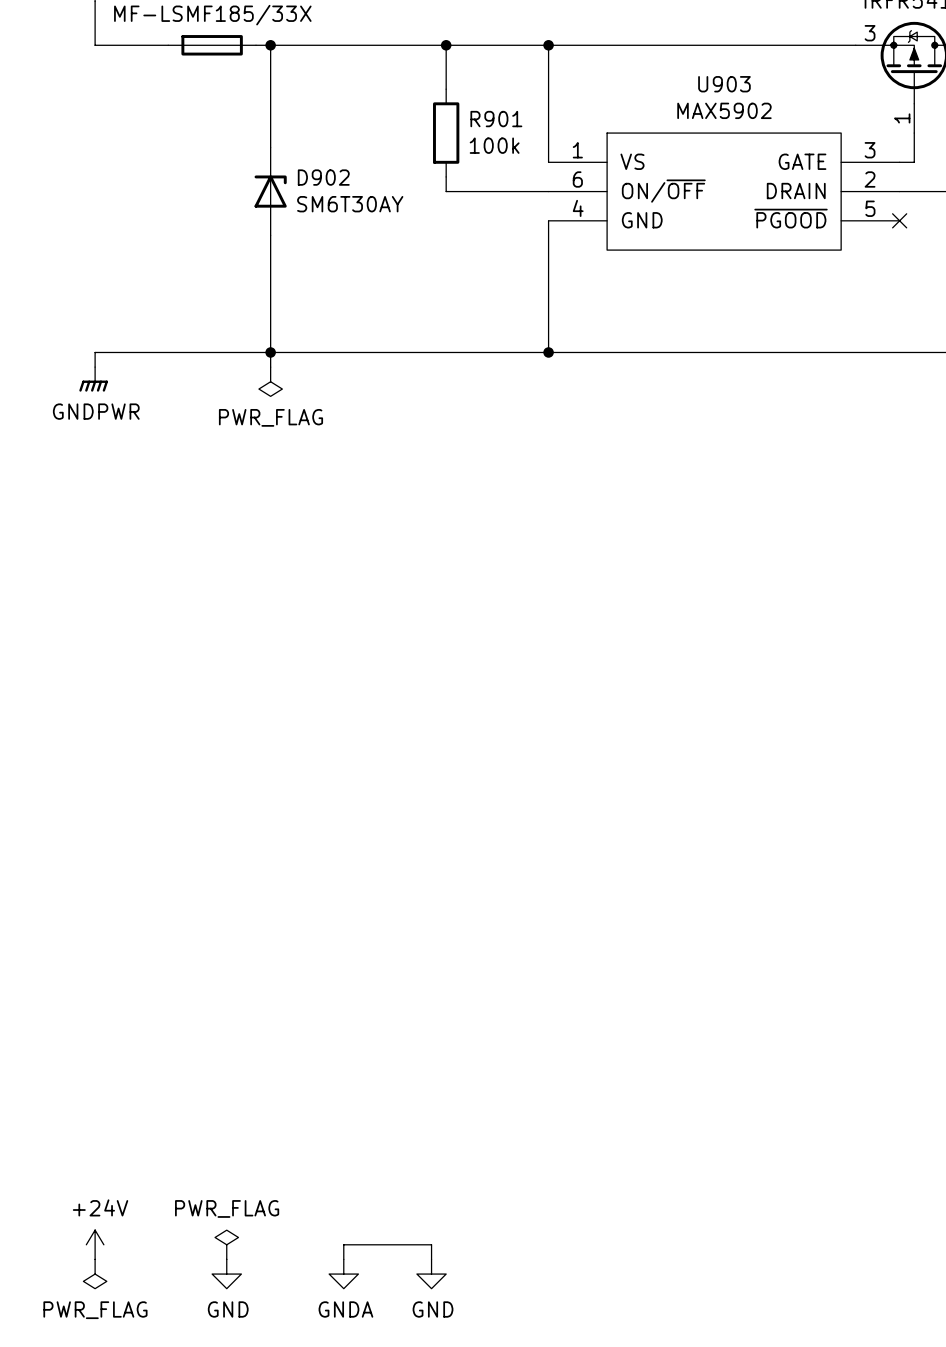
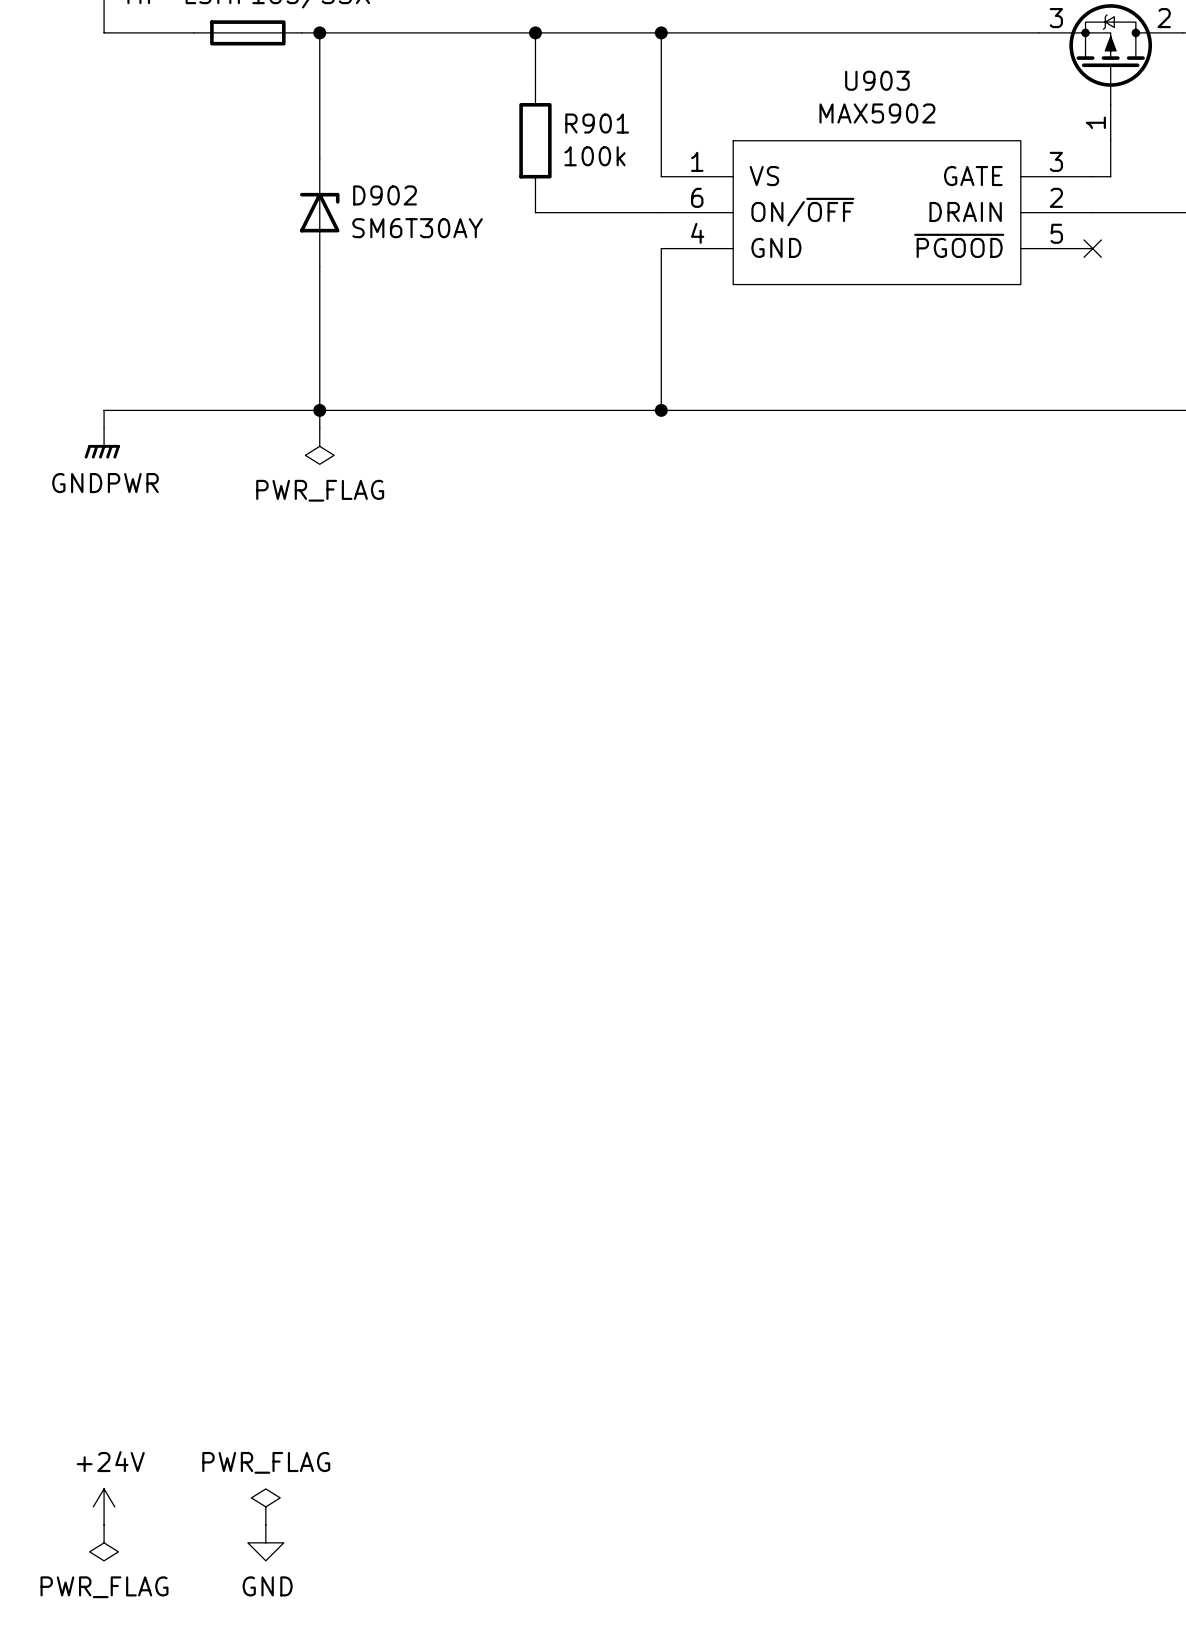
wire: (343, 1259) (343, 1244) (431, 1244) (431, 1259) -> none
power symbol: GNDA (343, 1274) -> none
power symbol: GND (431, 1274) -> none

